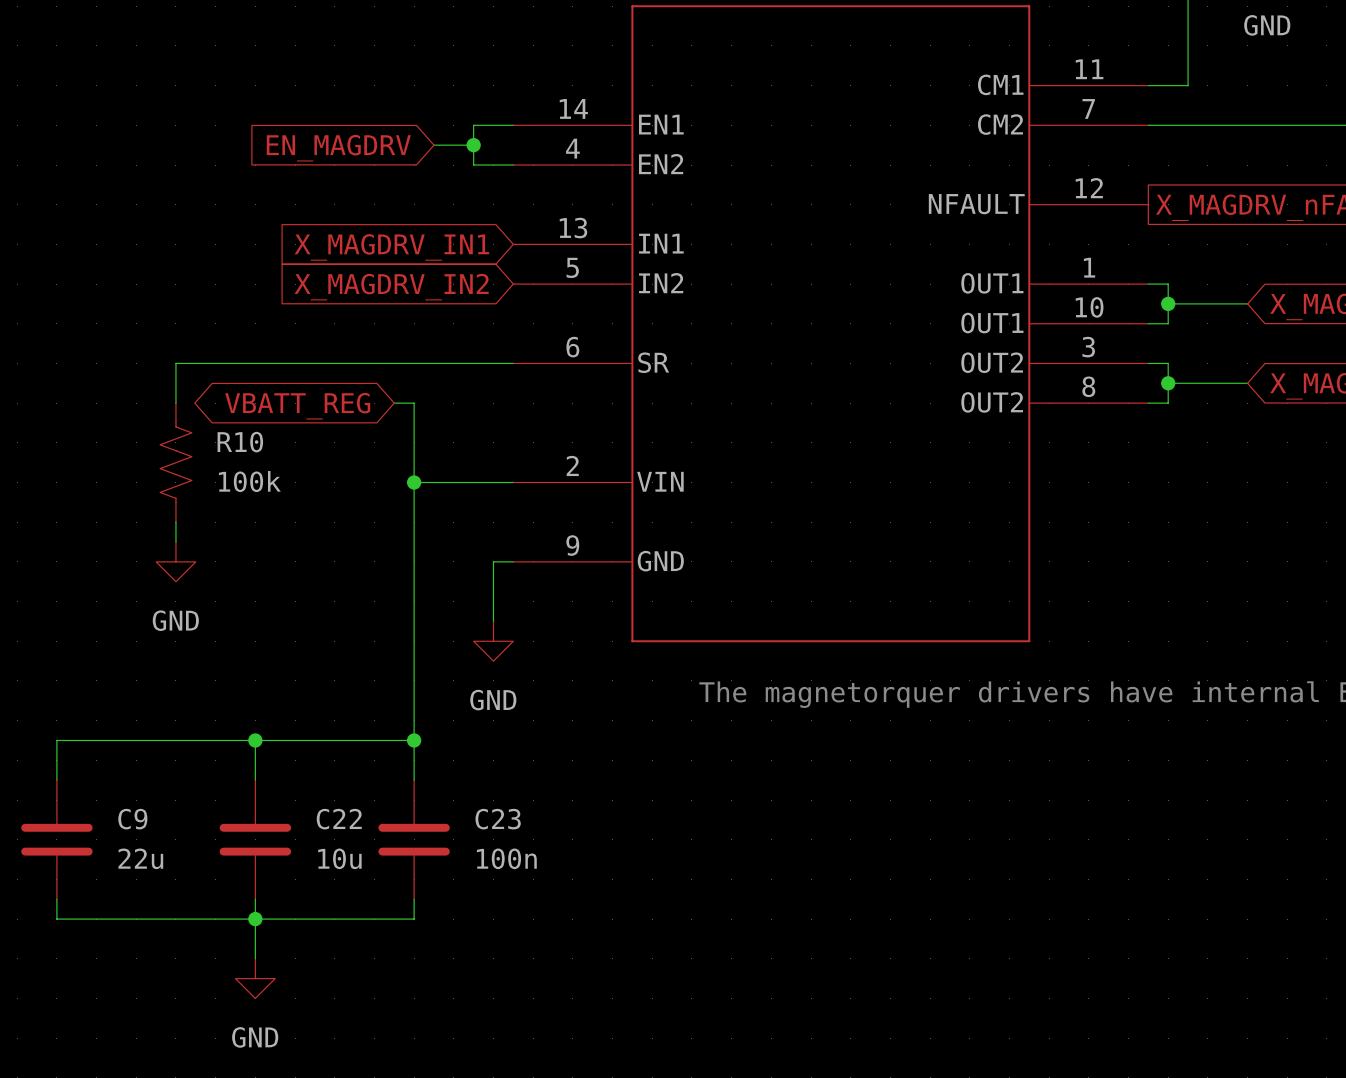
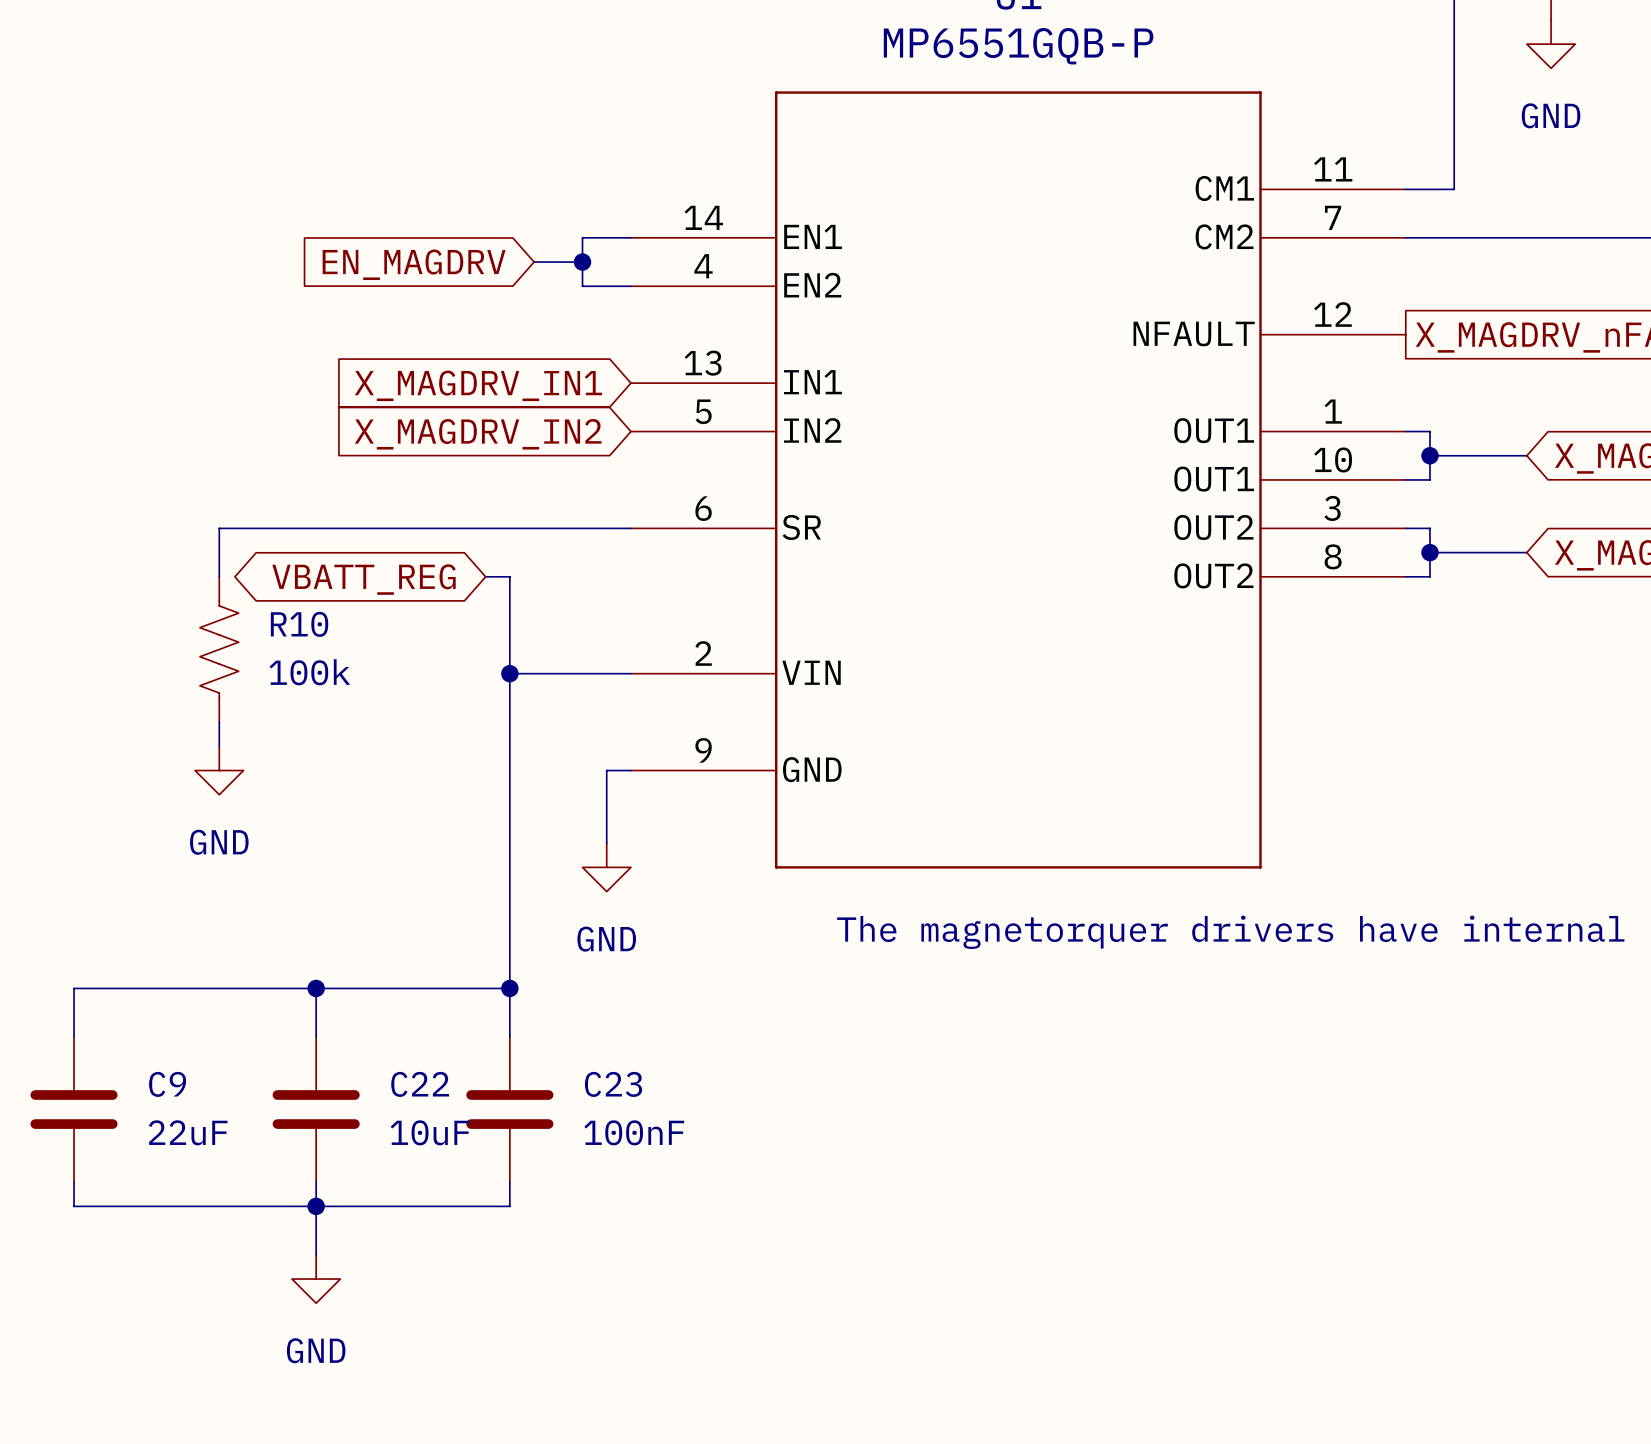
C9 value: 22u (140, 858) -> 22uF (188, 1132)
C22 value: 10u (339, 858) -> 10uF (430, 1132)
C23 value: 100n (506, 858) -> 100nF (634, 1132)

